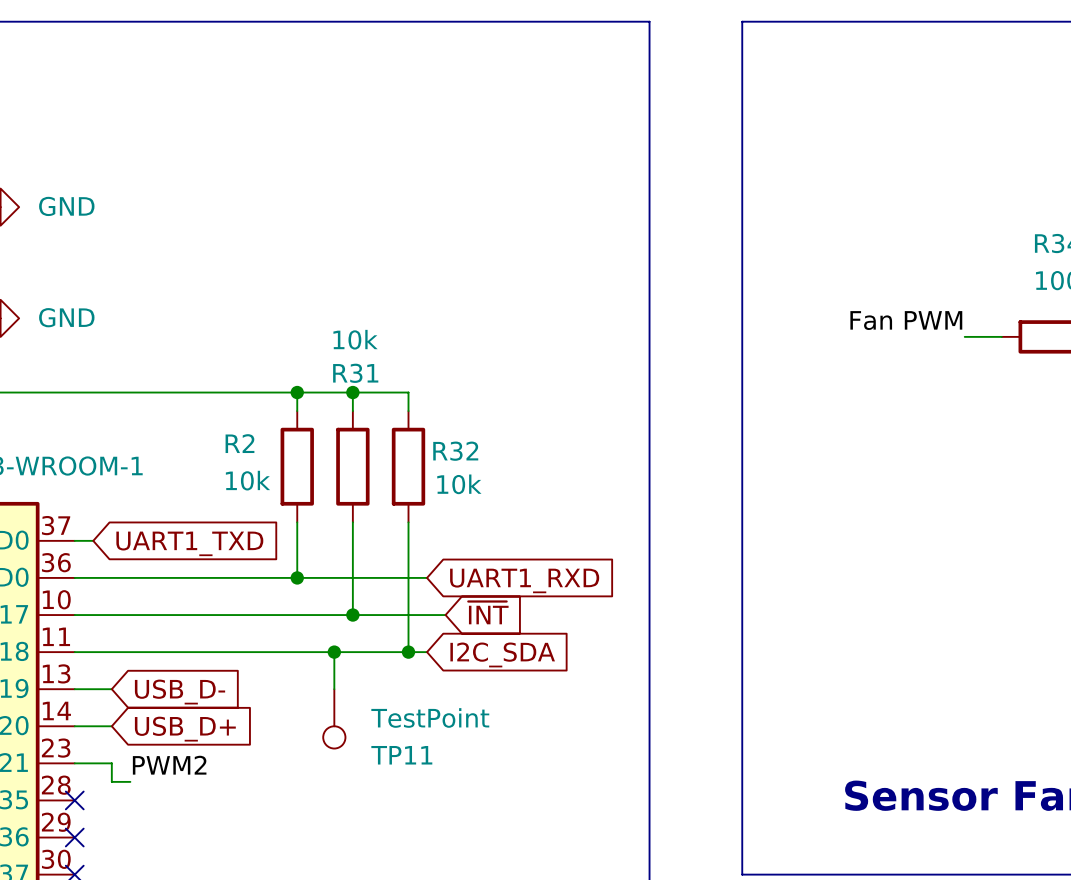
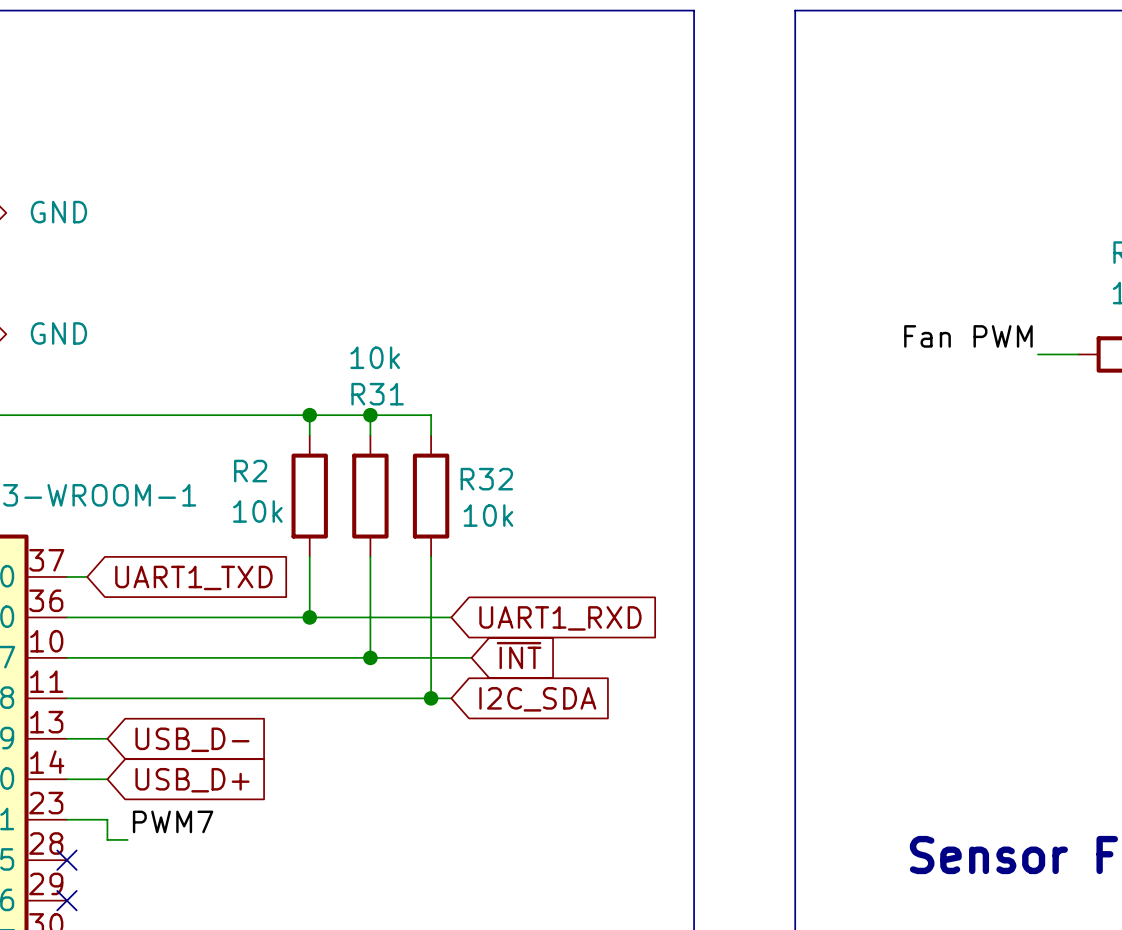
wire: (334, 652) (334, 689) -> none
junction: (334, 652) -> none
TP11: TestPoint (334, 718) -> none
label: PWM2 (169, 765) -> PWM7 (173, 821)

